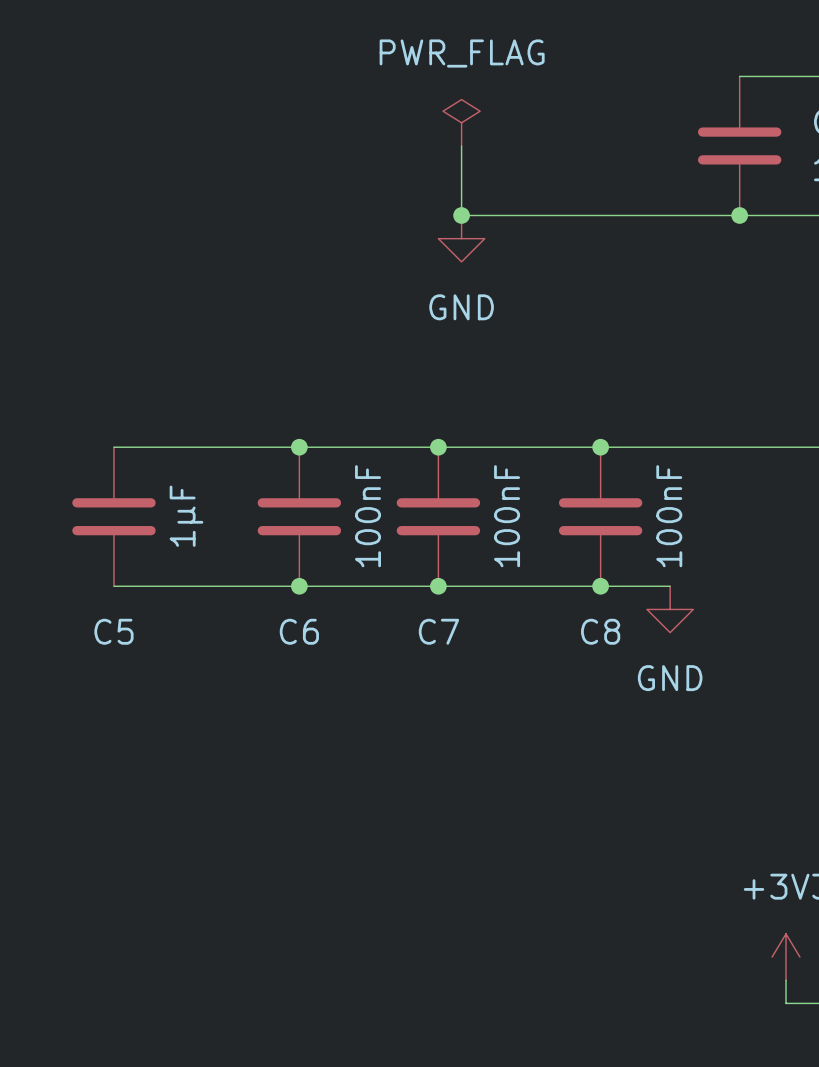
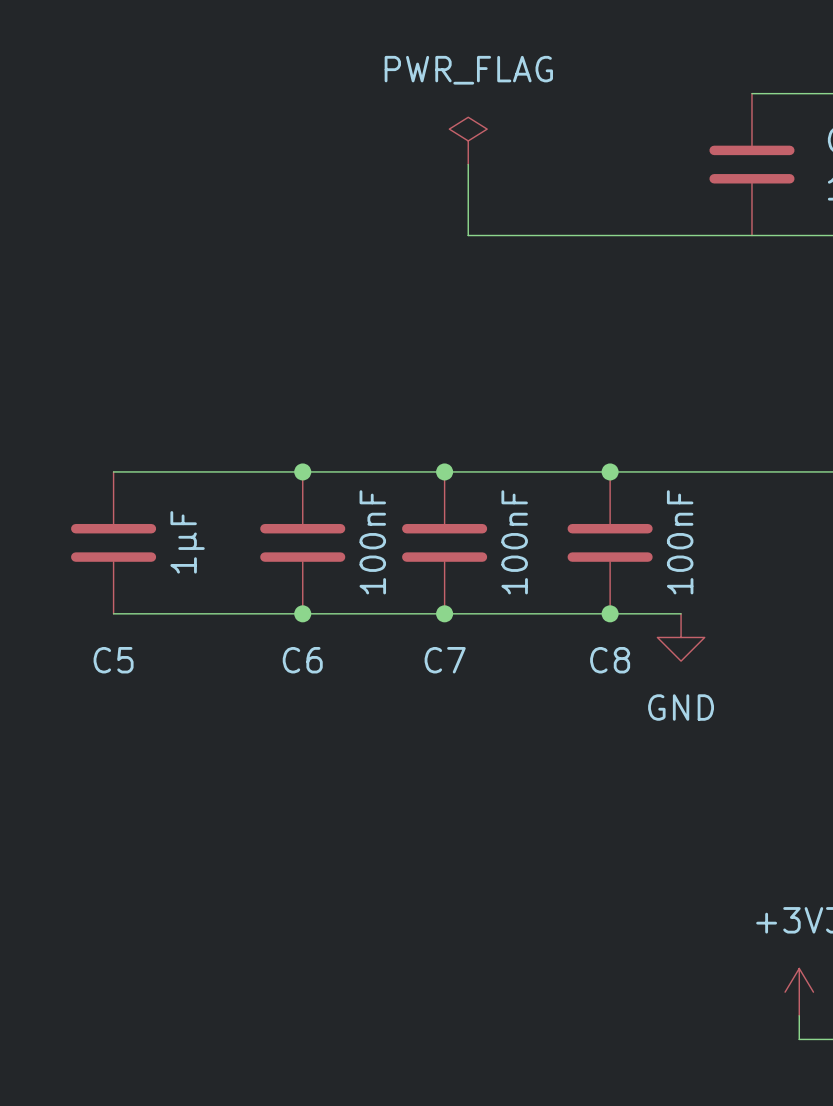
junction: (461, 215) -> none
junction: (739, 215) -> none
power symbol: GND (461, 238) -> none

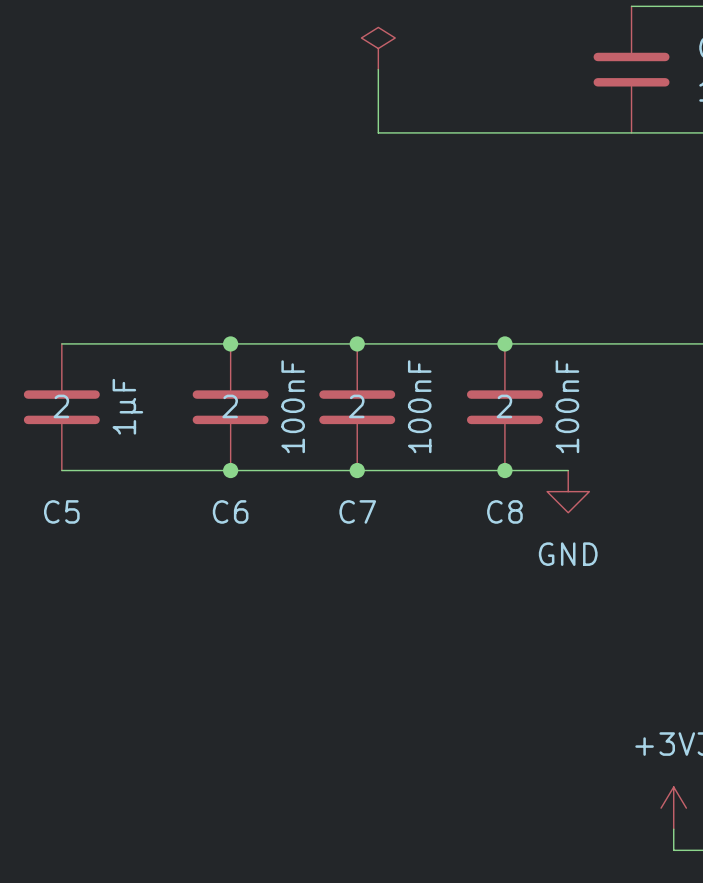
C5 text: none -> 2 (61, 406)
C6 text: none -> 2 (230, 406)
C7 text: none -> 2 (356, 406)
C8 text: none -> 2 (504, 406)

